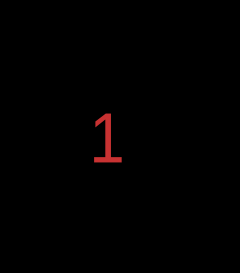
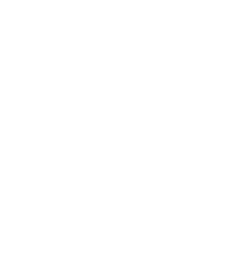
text: 1 (107, 137) -> none

